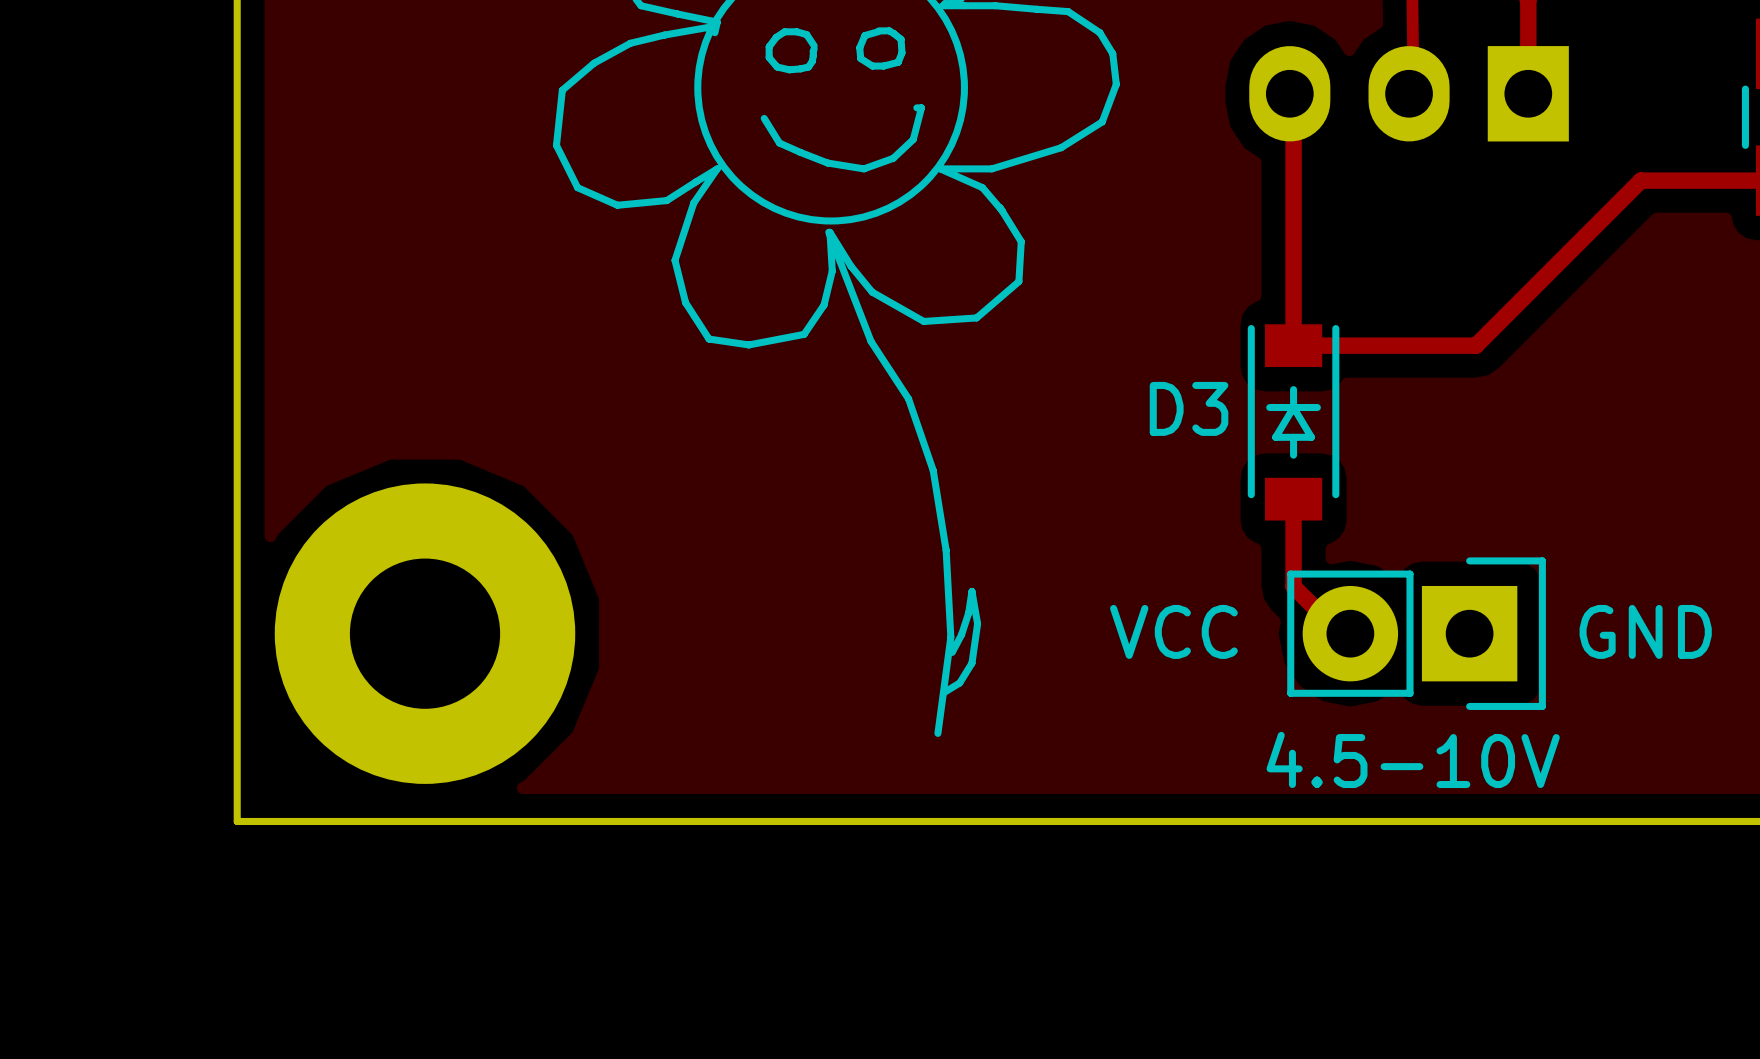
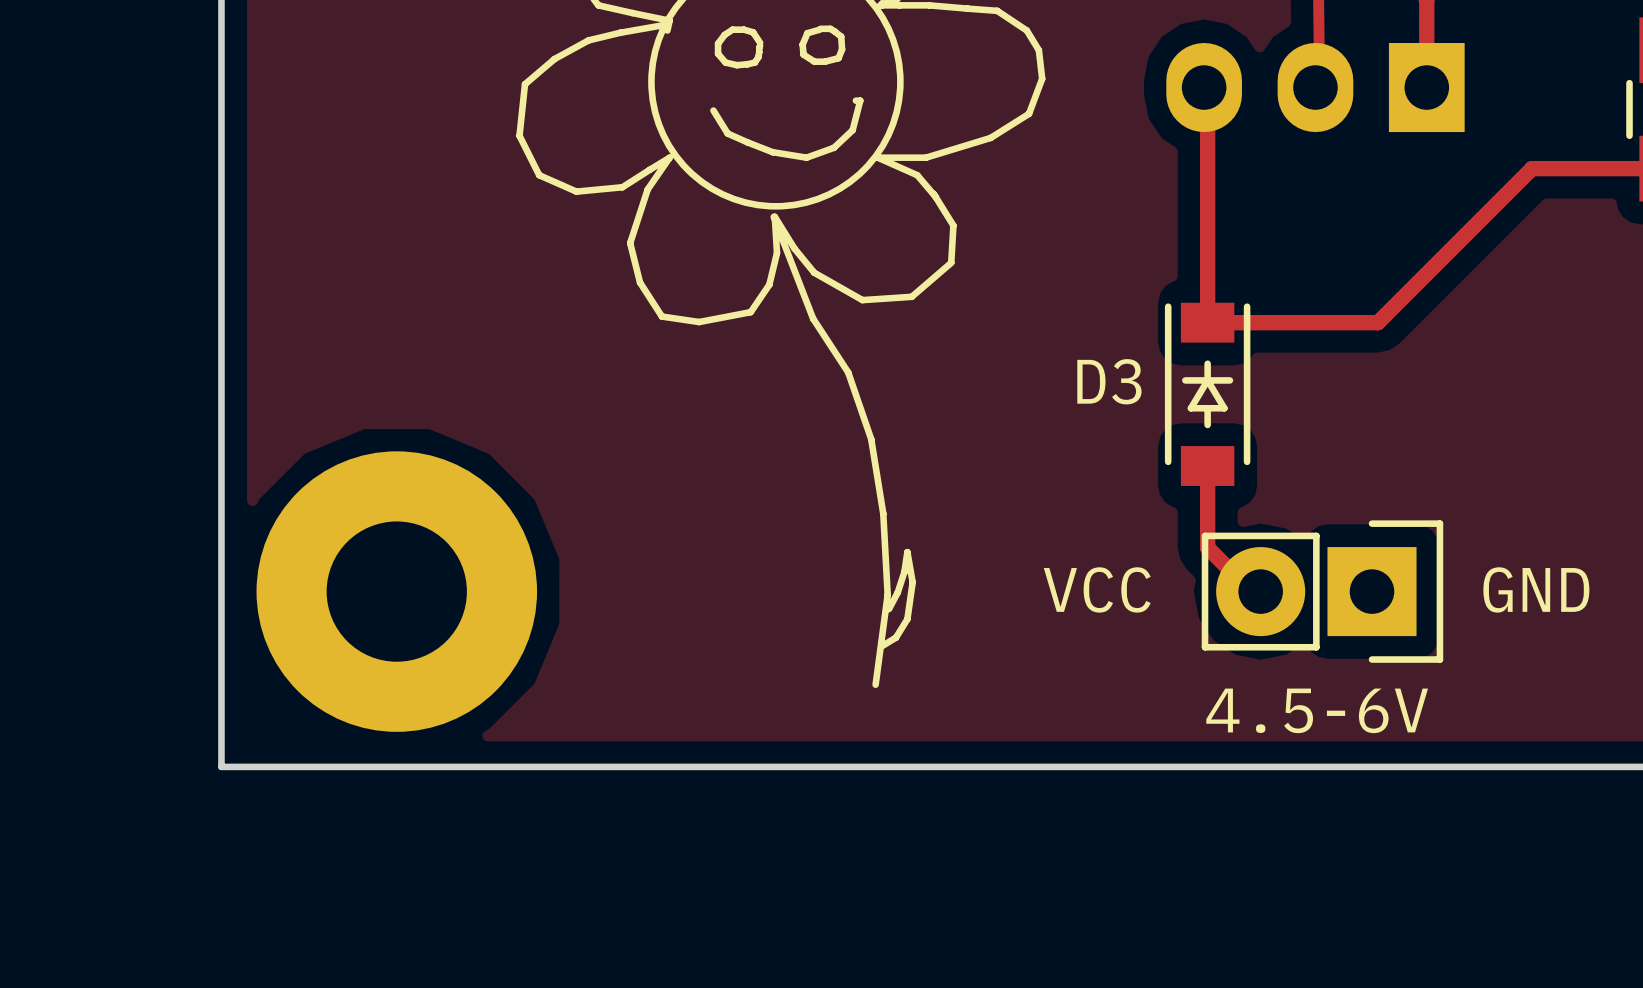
text: 4.5-10V (1413, 759) -> 4.5-6V (1317, 710)

